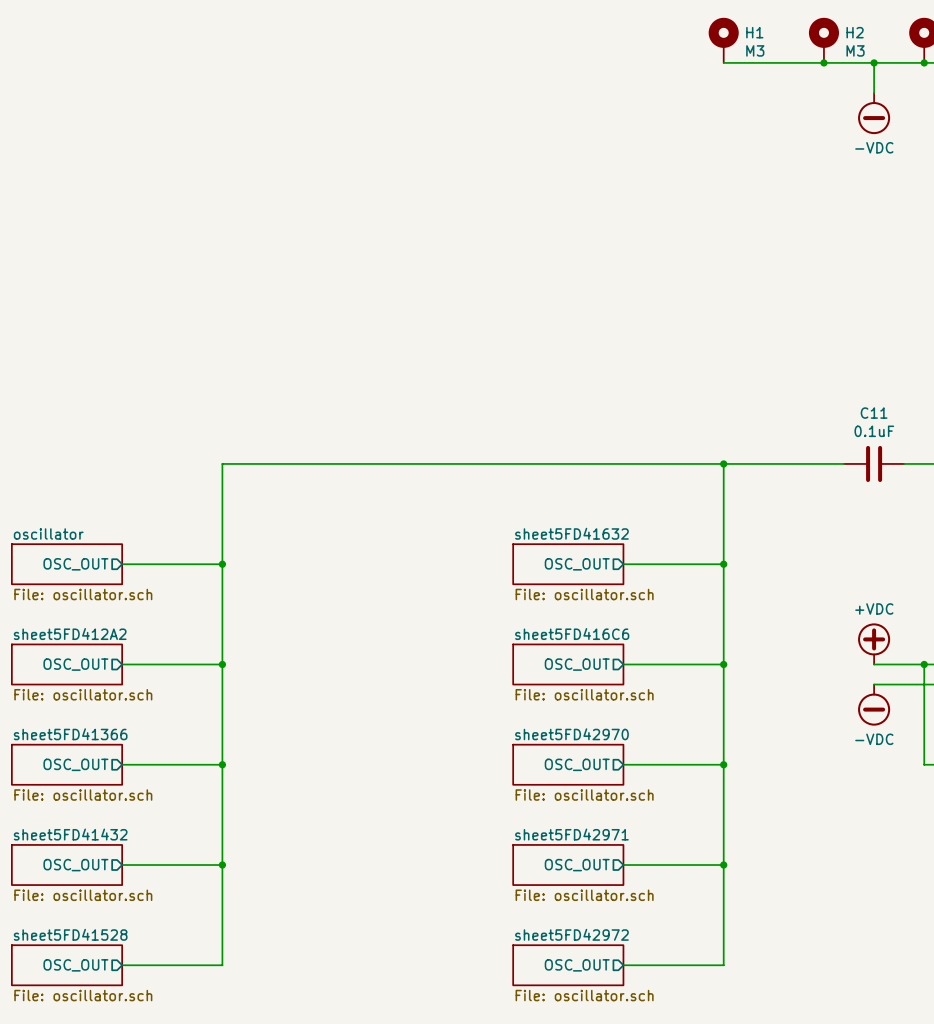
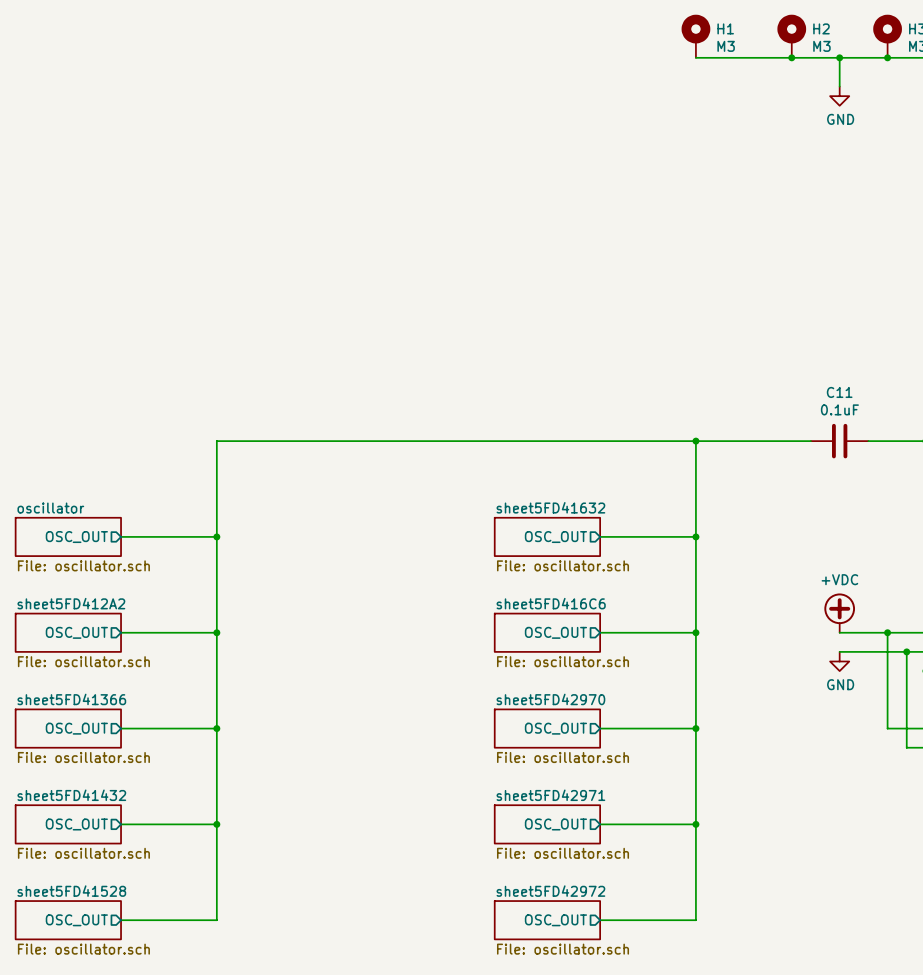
power symbol: none -> GND (839, 96)
power symbol: -VDC (874, 113) -> none
power symbol: none -> GND (839, 661)
power symbol: -VDC (874, 705) -> none

